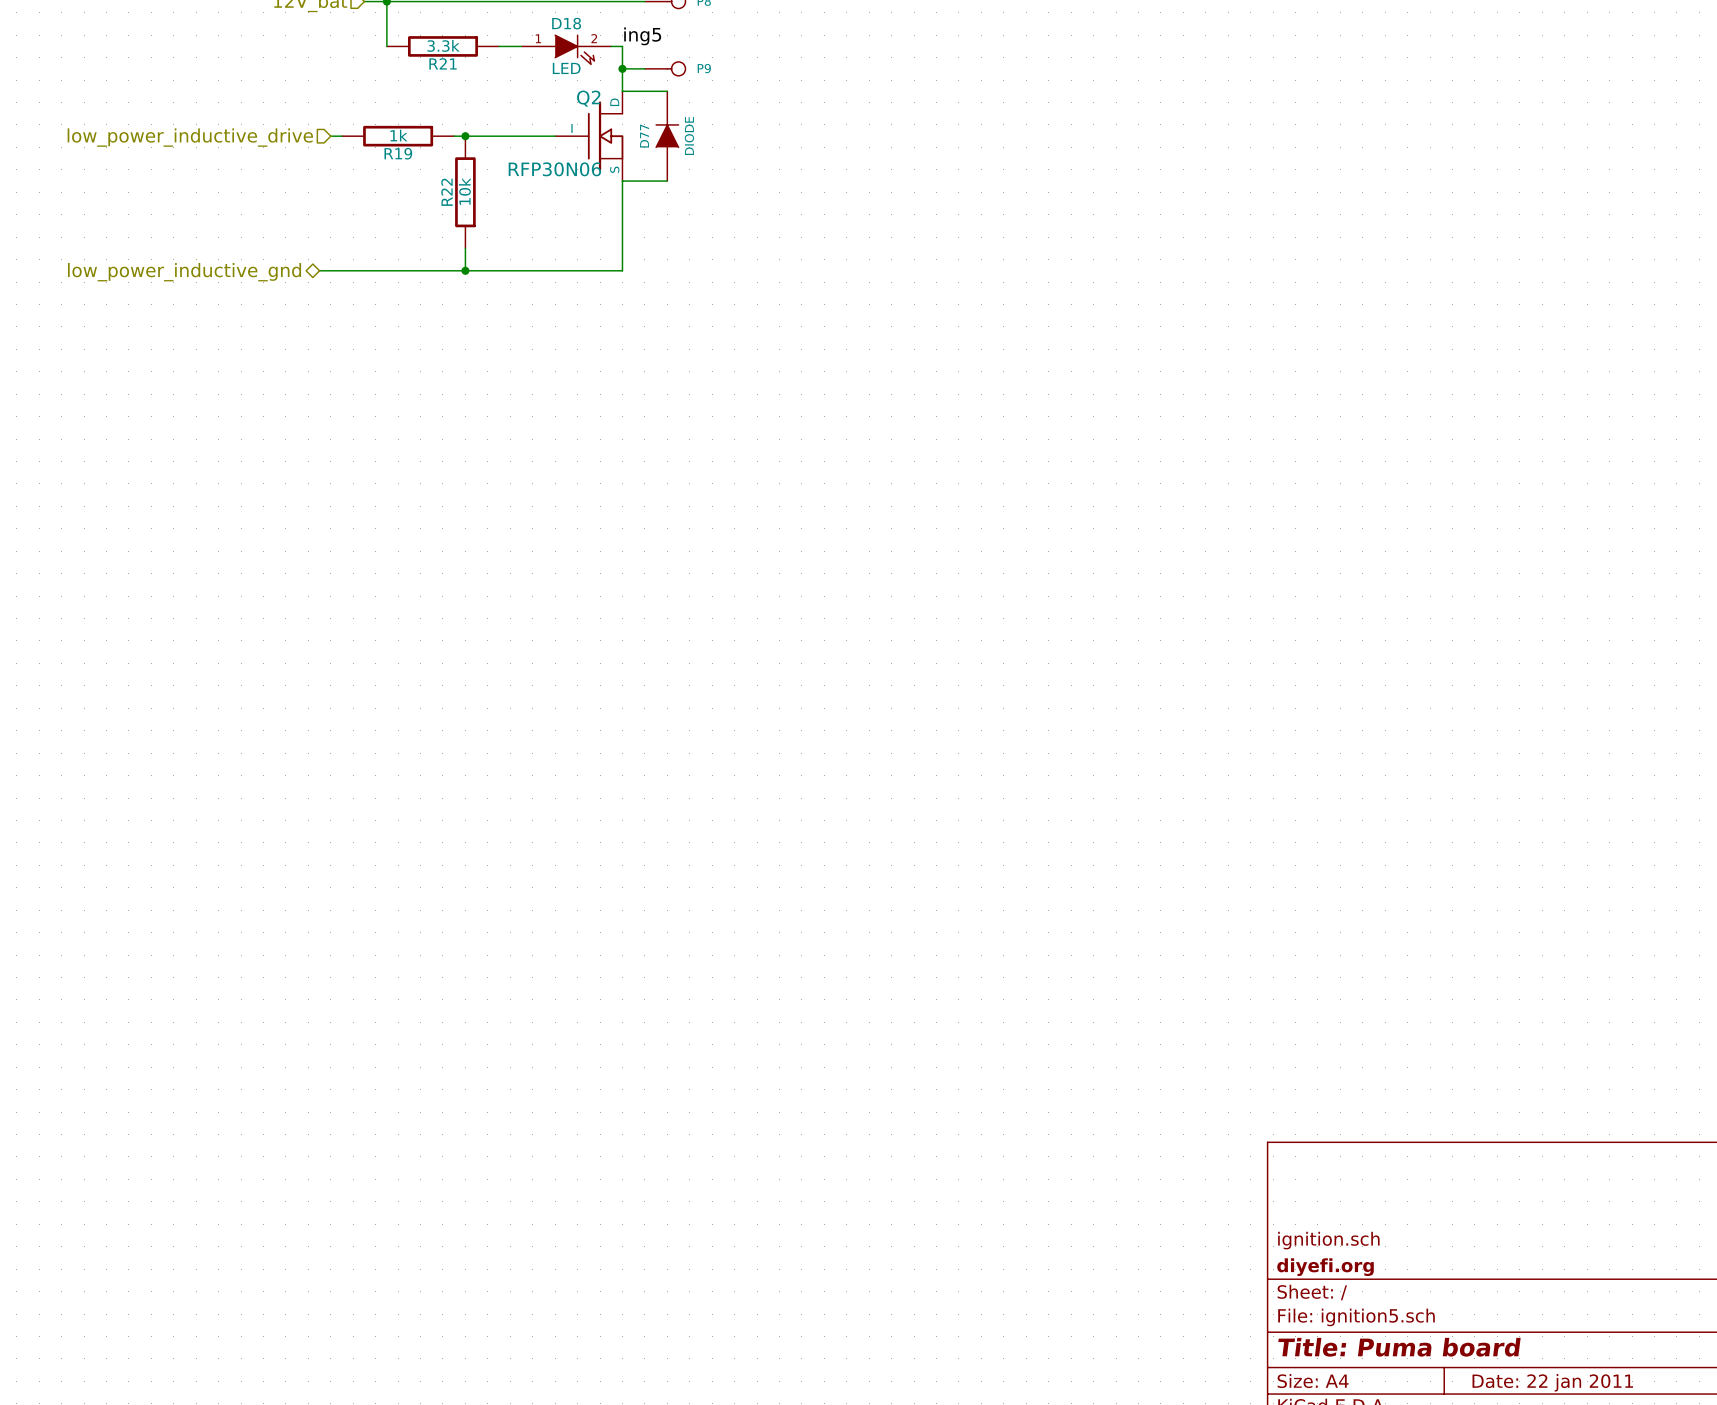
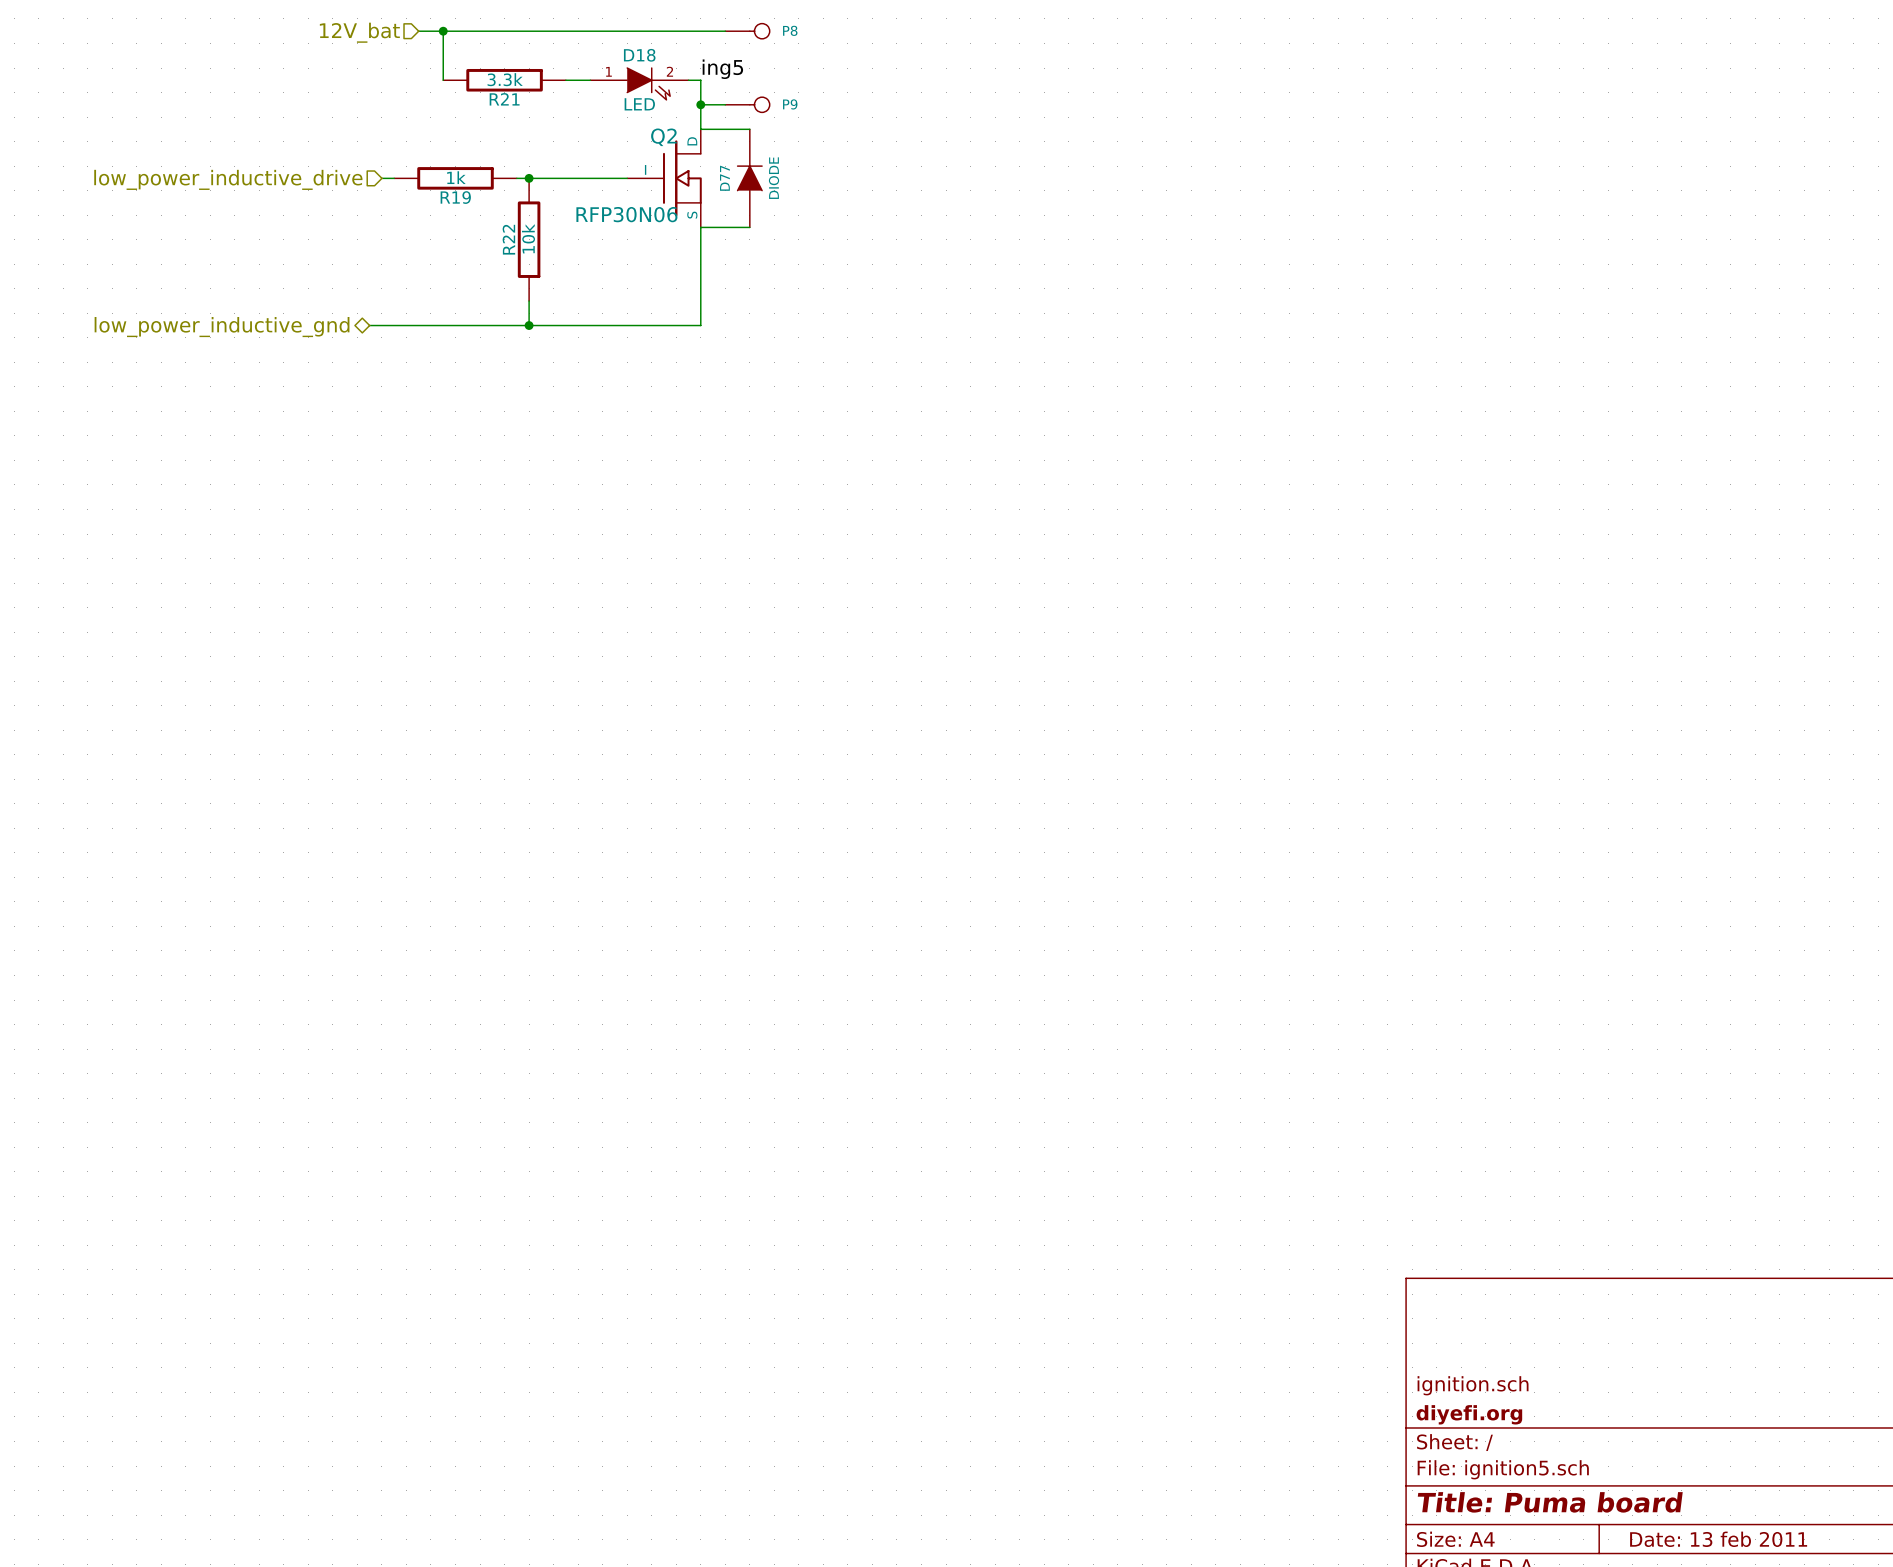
title block: Date: 22 jan 2011 (1552, 1382) -> Date: 13 feb 2011 (1718, 1539)

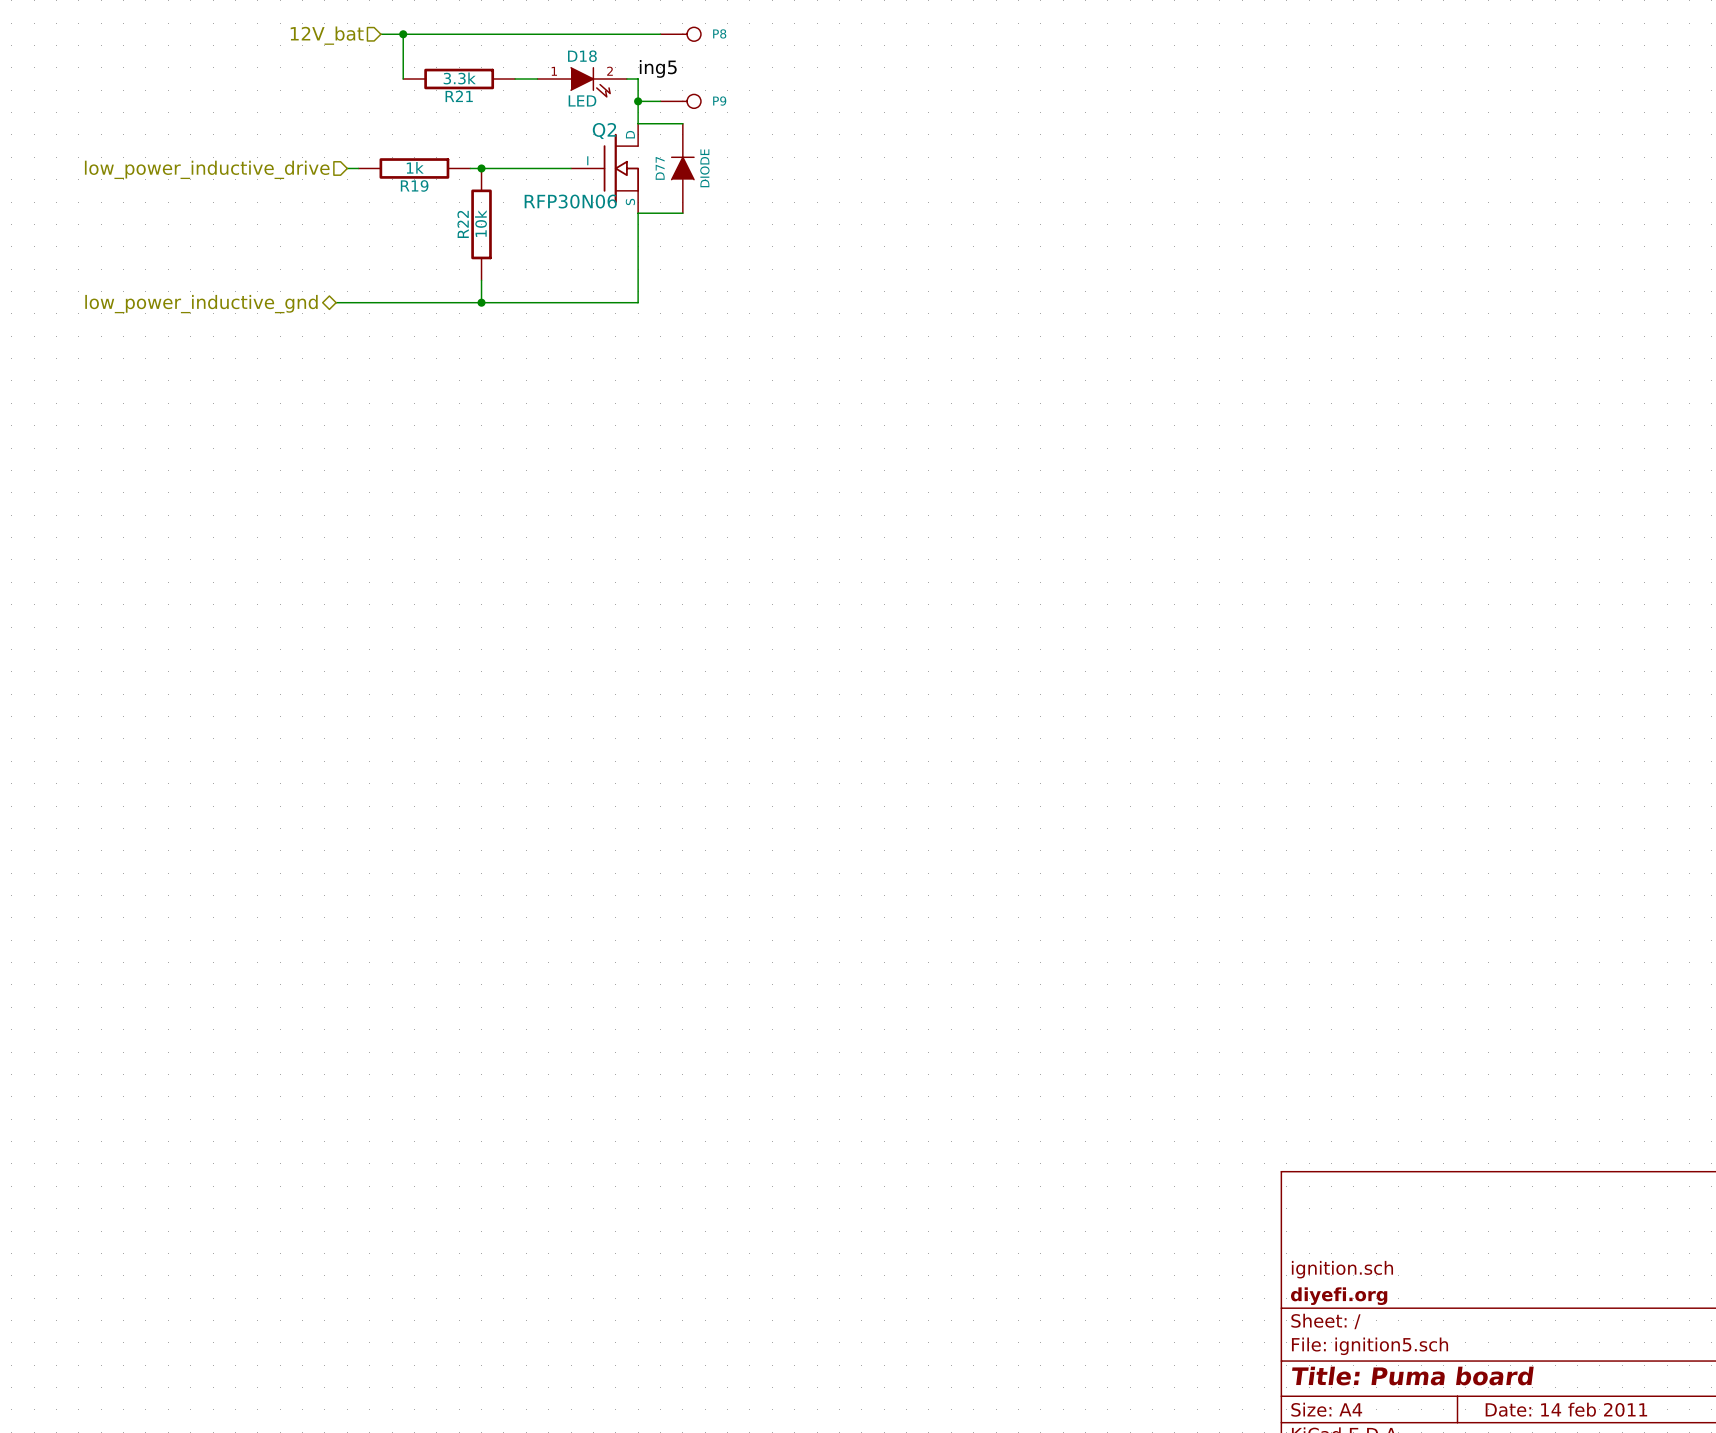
title block: Date: 13 feb 2011 (1718, 1539) -> Date: 14 feb 2011 (1566, 1409)

